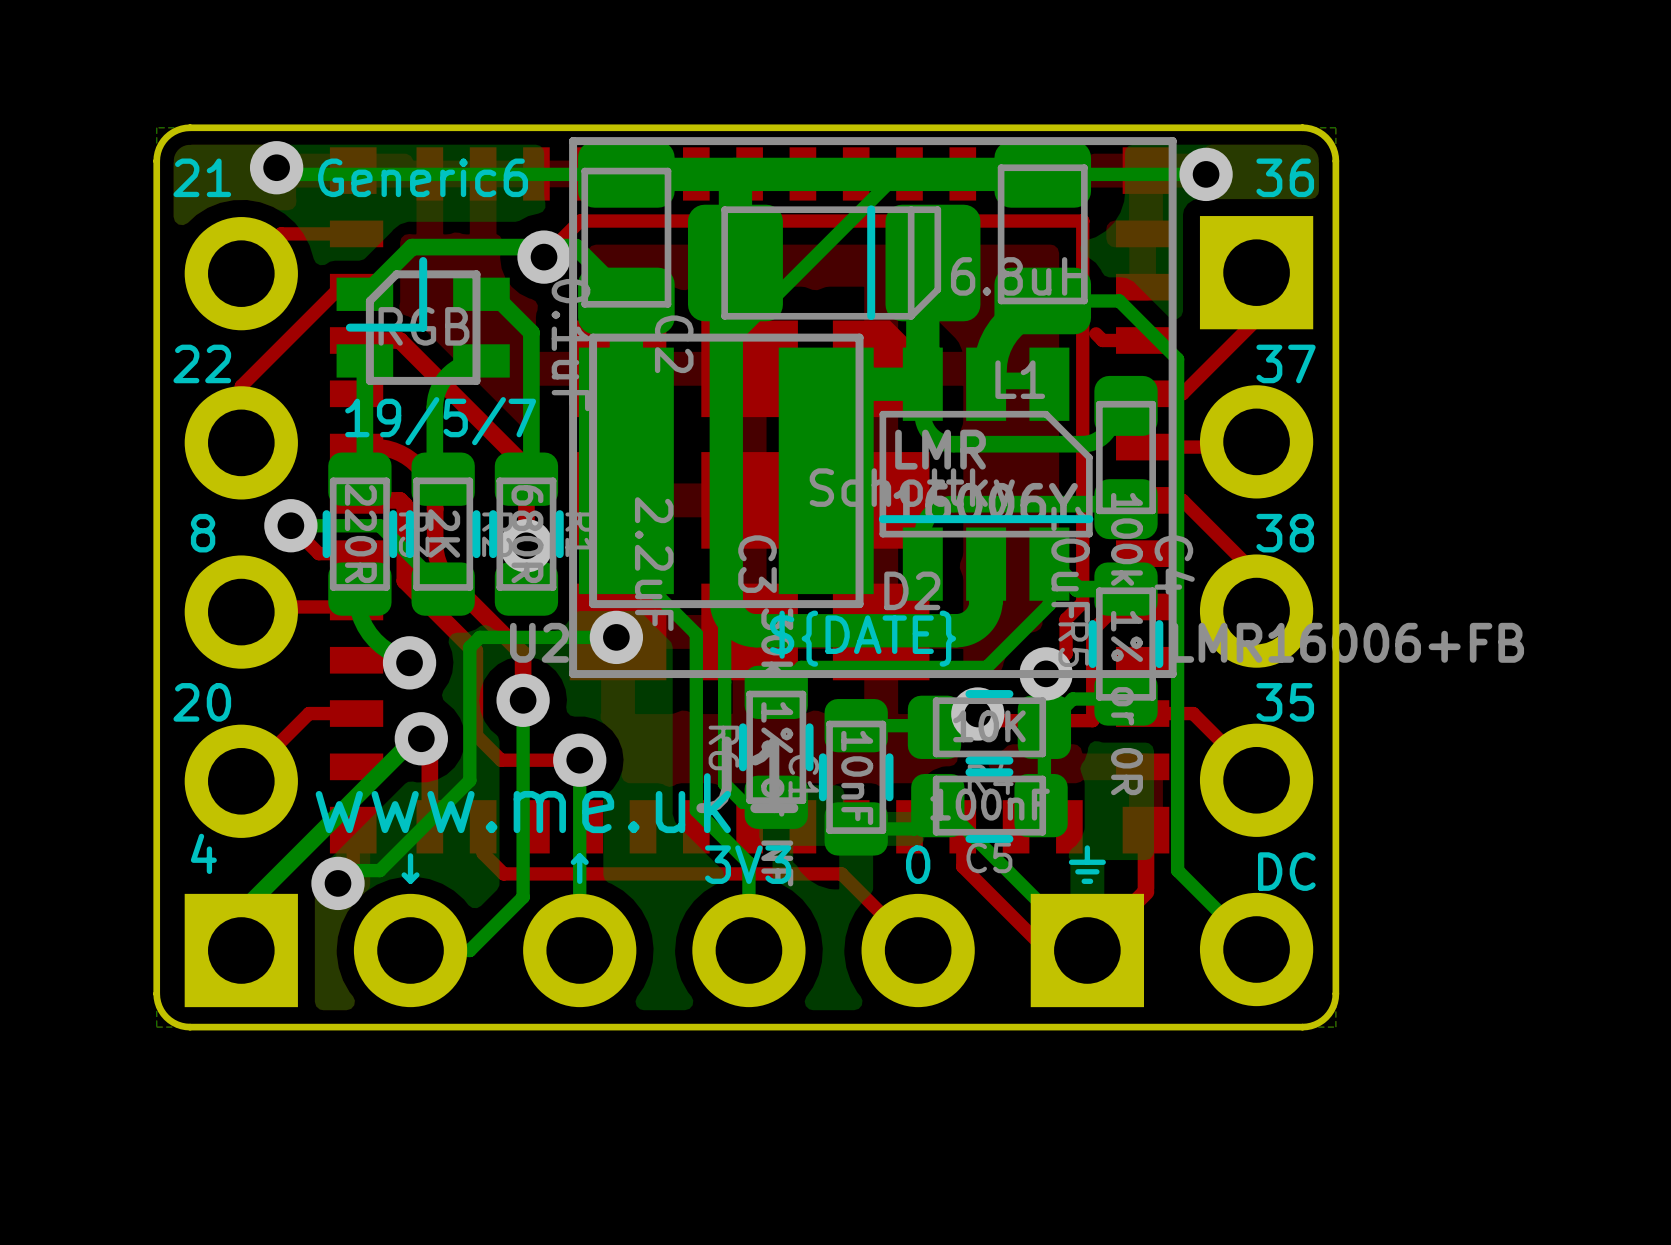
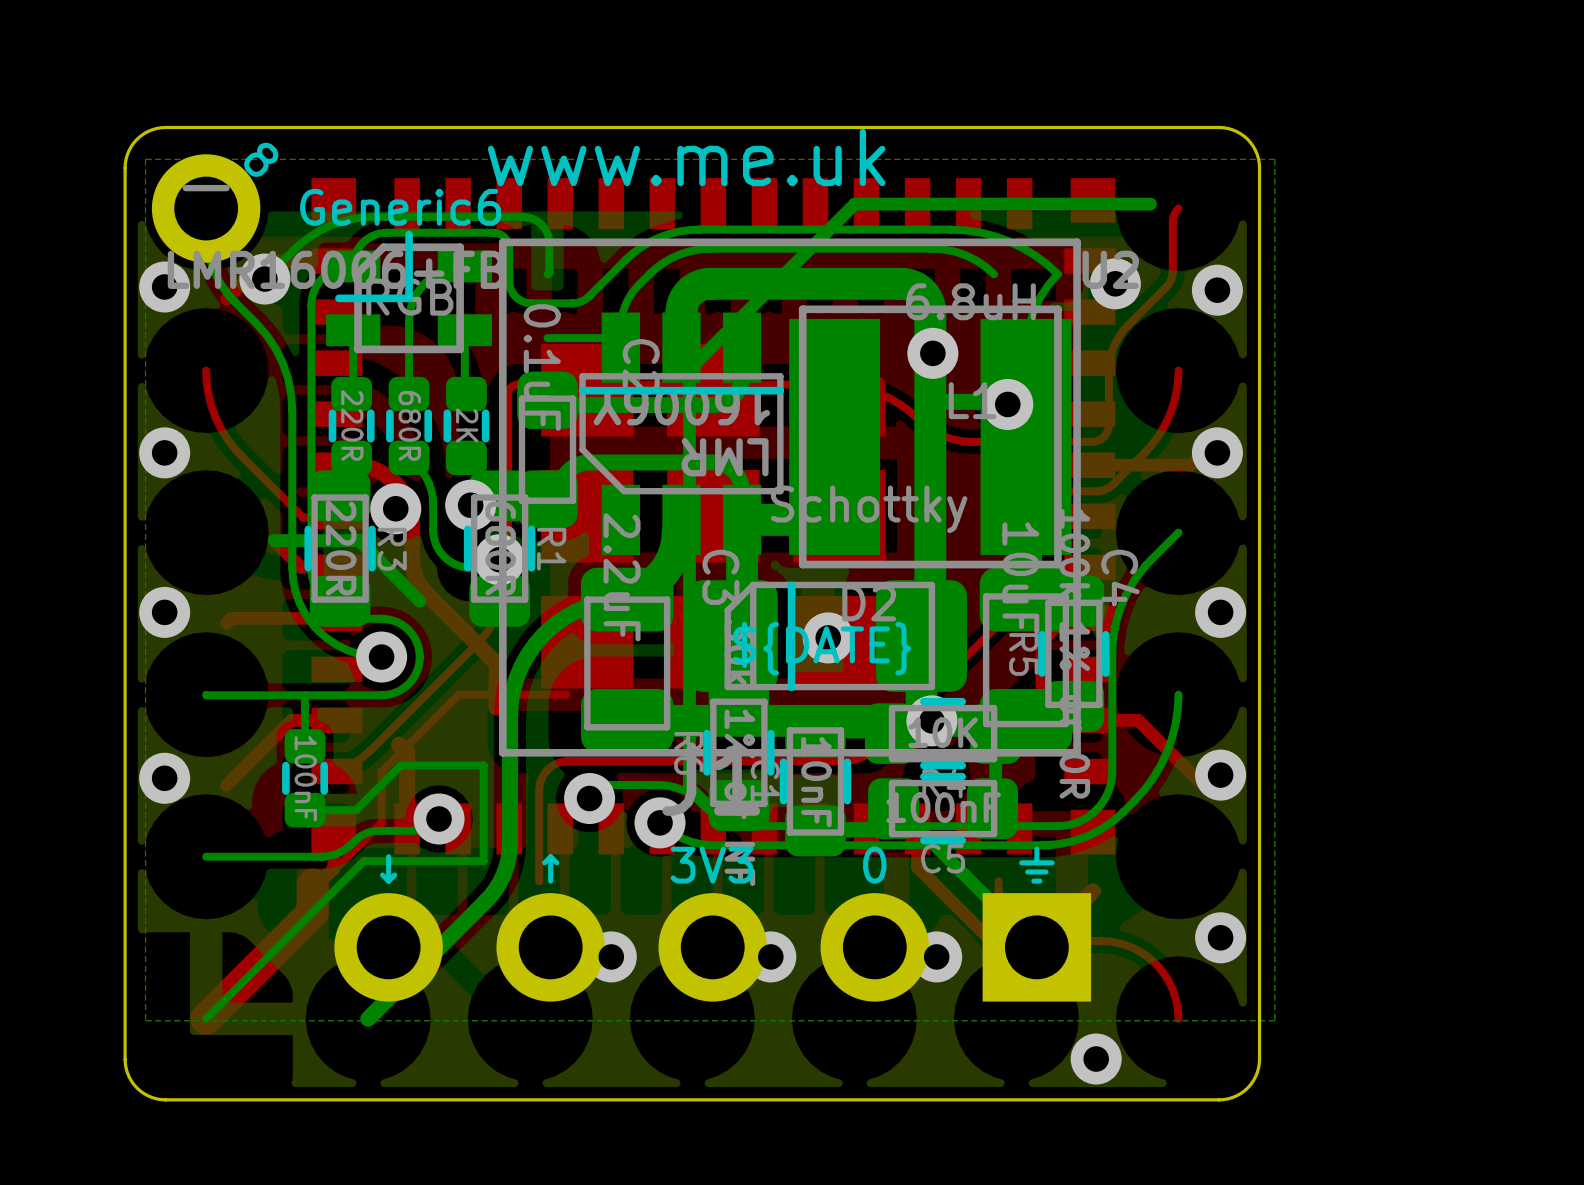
board edge: (1302, 127) (190, 127) (177, 130) (169, 134) (159, 148) (156, 161) (156, 993) (157, 1002) (163, 1014) (173, 1022) (190, 1027) (1302, 1027) (1315, 1024) (1322, 1020) (1331, 1010) (1335, 993) (1335, 161) (1333, 148) (1326, 137) (1315, 130) (1302, 127) -> (1219, 127) (1236, 131) (1247, 139) (1255, 150) (1259, 168) (1259, 1059) (1255, 1076) (1244, 1091) (1232, 1097) (1219, 1099) (165, 1099) (148, 1095) (133, 1084) (127, 1072) (125, 1059) (125, 168) (129, 150) (140, 136) (152, 129) (165, 127) (1219, 127)
bottom track: (276, 167) (283, 174) (626, 174) -> none
via: (276, 167) -> none
via: (1206, 174) -> none
text: 21 (202, 177) -> none
text: 36 (1285, 177) -> none
bottom track: none -> (206, 208) (206, 239) (213, 270) (229, 296) (266, 335) (282, 363) (288, 378) (292, 410) (292, 567) (295, 590) (299, 601) (310, 622) (318, 630) (336, 645) (358, 654) (381, 657)
part: none -> 8 (206, 208)
top track: none -> (1178, 208) (1172, 220) (1171, 277) (1165, 287) (1123, 330) (1113, 346) (1109, 365) (1108, 428) (1103, 436) (1095, 441) (972, 441) (952, 439) (934, 431) (890, 398) (868, 389) (845, 385) (518, 384) (512, 386) (508, 394) (507, 579) (503, 599) (495, 618) (476, 643) (365, 755) (345, 766) (315, 772)
bottom track: none -> (464, 266) (443, 270) (430, 277) (420, 288) (413, 300) (409, 322) (409, 394)
bottom track: none -> (547, 274) (549, 272) (548, 237) (541, 224) (531, 218) (374, 216) (341, 221) (320, 230) (301, 242) (264, 279)
bottom track: none -> (994, 274) (965, 255) (943, 249) (702, 249) (685, 252) (670, 258) (656, 268) (634, 289) (628, 299) (622, 316) (620, 347) (611, 338) (547, 338)
via: none -> (264, 279)
top track: (544, 257) (580, 221) (1082, 221) (1082, 602) (1066, 619) (1066, 653) (1046, 673) -> none
via: (544, 257) -> none
via: none -> (1115, 283)
via: none -> (164, 287)
via: none -> (1217, 290)
top track: (1256, 269) (1256, 319) (1182, 393) (1142, 393) -> none
top track: (356, 287) (340, 287) (241, 386) (241, 442) -> none
bottom track: (364, 294) (412, 247) (575, 247) (626, 297) -> none
bottom track: (481, 294) (493, 294) (531, 332) (531, 474) (526, 479) -> none
bottom track: (1042, 300) (1119, 300) (1177, 359) (1177, 870) (1256, 949) -> none
bottom track: none -> (353, 330) (353, 392) (351, 394)
bottom track: none -> (464, 330) (464, 392) (466, 394)
part position: (423, 320) -> (409, 291)
via: none -> (932, 353)
top track: (1096, 333) (1102, 340) (1142, 340) -> none
top track: (356, 340) (399, 340) (526, 467) (526, 545) -> none
top track: none -> (206, 370) (208, 394) (215, 416) (233, 447) (303, 517) (315, 517)
top track: none -> (1178, 370) (1173, 404) (1164, 425) (1151, 444) (1110, 486) (1099, 491) (1039, 491) (1032, 495) (1030, 502) (1030, 569) (1024, 590) (1018, 603) (871, 751) (856, 759) (843, 761) (568, 761) (557, 763) (545, 772) (539, 786) (539, 881)
bottom track: (364, 360) (364, 470) -> none
bottom track: (481, 360) (471, 362) (456, 368) (448, 374) (439, 387) (435, 402) (434, 464) -> none
text: 22 (202, 363) -> none
text: 37 (1286, 363) -> none
via: none -> (1007, 404)
part: none -> 220R (351, 425)
part: none -> 680R (409, 425)
part: none -> 2K (466, 425)
U2 rotation: 0° (872, 407) -> 180° (789, 497)
bottom track: none -> (1026, 436) (1026, 337) (1034, 309) (1040, 296) (1057, 274) (1034, 255) (994, 236) (950, 229) (689, 230) (659, 237) (641, 247) (581, 301) (531, 303) (519, 299) (511, 290) (509, 283) (508, 244) (505, 238) (499, 233) (386, 232) (375, 234) (365, 240) (358, 248) (353, 266) (335, 269) (322, 277) (316, 285) (311, 300) (311, 574) (318, 593) (326, 603) (336, 611) (355, 618) (391, 620) (408, 629) (414, 637) (419, 652) (416, 671) (404, 687) (386, 695) (206, 694)
text: 19/5/7 (440, 421) -> none
via: none -> (164, 452)
via: none -> (1217, 452)
bottom track: none -> (409, 457) (422, 471) (431, 490) (433, 535) (438, 549) (451, 562) (470, 567)
bottom track: (626, 470) (626, 564) (696, 634) (696, 810) (748, 863) (748, 950) -> none
via: none -> (470, 505)
via: none -> (395, 508)
top track: (356, 500) (399, 500) (404, 505) (404, 581) (474, 651) (474, 734) (501, 760) (579, 760) -> none
top track: (1142, 500) (1182, 500) (1256, 574) (1256, 607) -> none
bottom track: none -> (1178, 532) (1145, 566) (1134, 579) (1119, 611) (1112, 645) (1111, 781) (1108, 792) (1099, 806) (1092, 813) (1078, 821) (1057, 826) (749, 826) (733, 824) (718, 817) (691, 794) (670, 786) (603, 785) (589, 798)
via: (290, 525) -> none
text: 8 (203, 533) -> none
text: 38 (1285, 533) -> none
part: 2K (443, 534) -> none
bottom track: (1049, 564) (1049, 604) (986, 667) (801, 667) (776, 692) -> none
bottom track: none -> (627, 599) (601, 602) (576, 611) (544, 633) (528, 654) (516, 678) (510, 703) (510, 842) (508, 858) (503, 874) (496, 888) (485, 901) (368, 1018)
bottom track: (356, 594) (358, 610) (369, 633) (381, 646) (403, 658) -> none
via: none -> (164, 612)
via: none -> (1220, 612)
part: (1256, 611) -> none
part: (241, 612) -> none
via: none -> (828, 637)
bottom track: (616, 637) (479, 637) (469, 647) (469, 780) (379, 870) (350, 870) (338, 883) -> none
via: (616, 637) -> none
via position: (409, 662) -> (381, 657)
via: (1046, 673) -> none
top track: none -> (566, 694) (458, 694) (381, 771) (381, 822) (320, 884) (312, 884) (312, 912) (206, 1018)
bottom track: none -> (1178, 694) (1172, 738) (1160, 765) (1144, 790) (1123, 811) (1099, 830) (1072, 841) (1043, 845)
bottom track: none -> (305, 695) (305, 746)
bottom track: (523, 700) (523, 897) (469, 950) (410, 950) -> none
via: (523, 700) -> none
text: 20 (202, 702) -> none
text: 35 (1285, 702) -> none
bottom track: (421, 738) (414, 738) (241, 911) (241, 947) -> none
via: (421, 738) -> none
bottom track: (579, 760) (579, 950) -> none
via position: (579, 760) -> (589, 798)
via: none -> (1220, 775)
via: none -> (164, 778)
part: none -> 100nF (305, 778)
text position: www.me.uk (523, 803) -> www.me.uk (686, 157)
bottom track: none -> (305, 810) (356, 810) (400, 765) (483, 765) (483, 861) (363, 861) (206, 1018)
bottom track: none -> (439, 818) (425, 827) (415, 830) (370, 832) (358, 837) (341, 851) (329, 855) (206, 856)
via: none -> (439, 818)
bottom track: none -> (660, 822) (678, 836) (706, 844) (1049, 845)
via: none -> (660, 822)
top track: (483, 826) (483, 853) (503, 873) (841, 873) (918, 950) -> none
top track: (1145, 830) (1145, 888) -> none
text: 4 (203, 853) -> none
text: DC (1286, 871) -> none
top track: none -> (998, 881) (999, 897) (1002, 910) (1013, 926) (1023, 934) (1041, 940) (1110, 941) (1130, 946) (1148, 957) (1168, 979) (1175, 998) (1178, 1018)
via: (338, 883) -> none
via: none -> (1220, 937)
via: none -> (611, 956)
via: none -> (770, 956)
via: none -> (936, 956)
via: none -> (1096, 1059)

